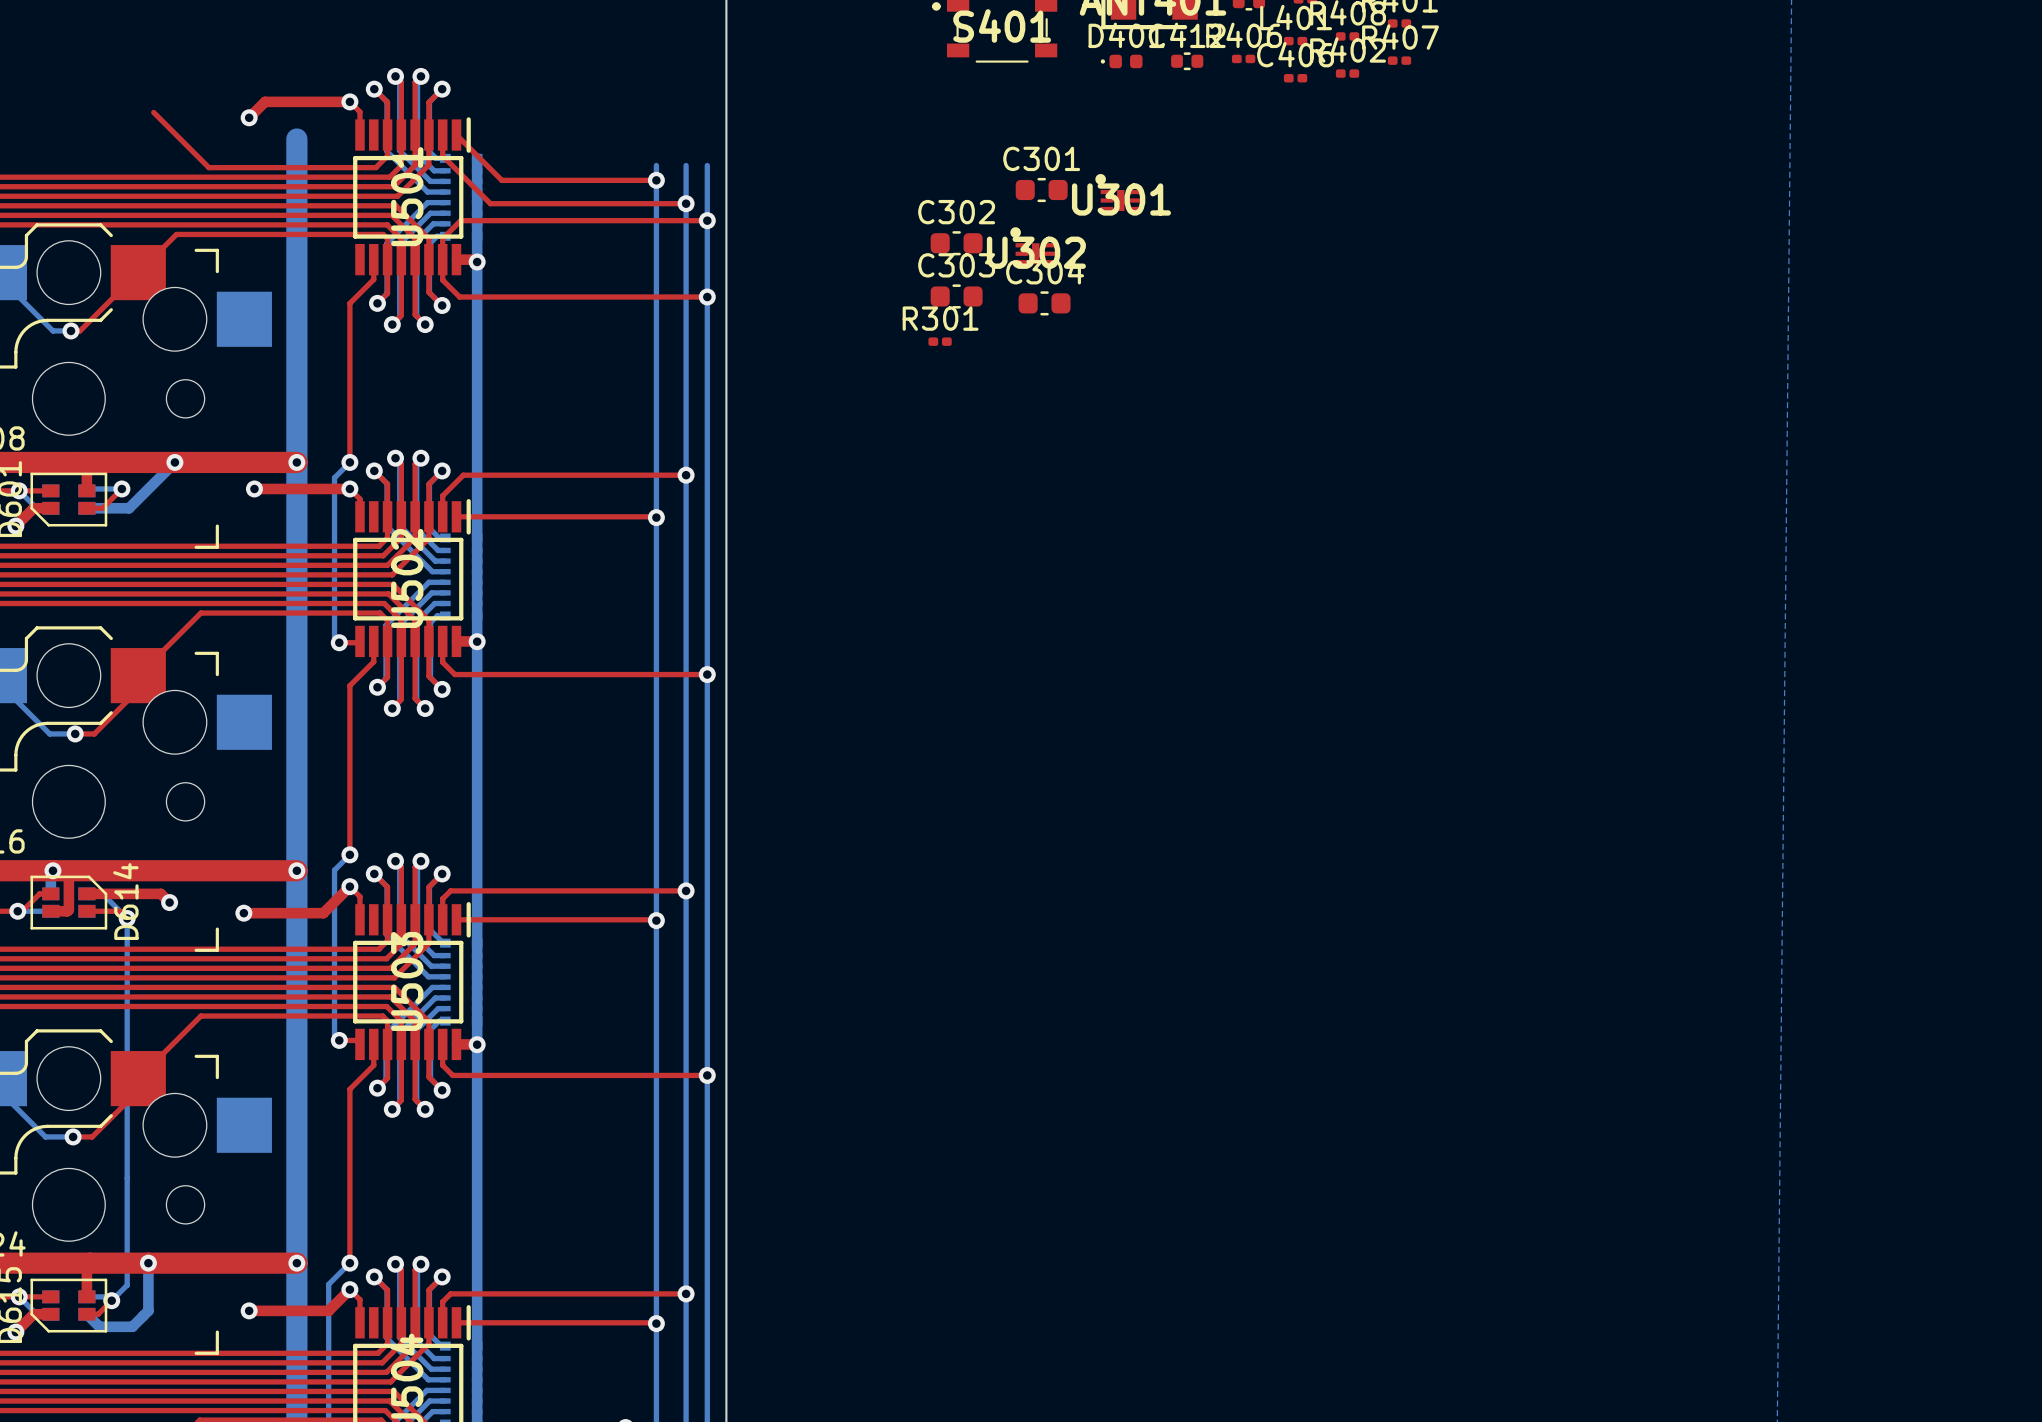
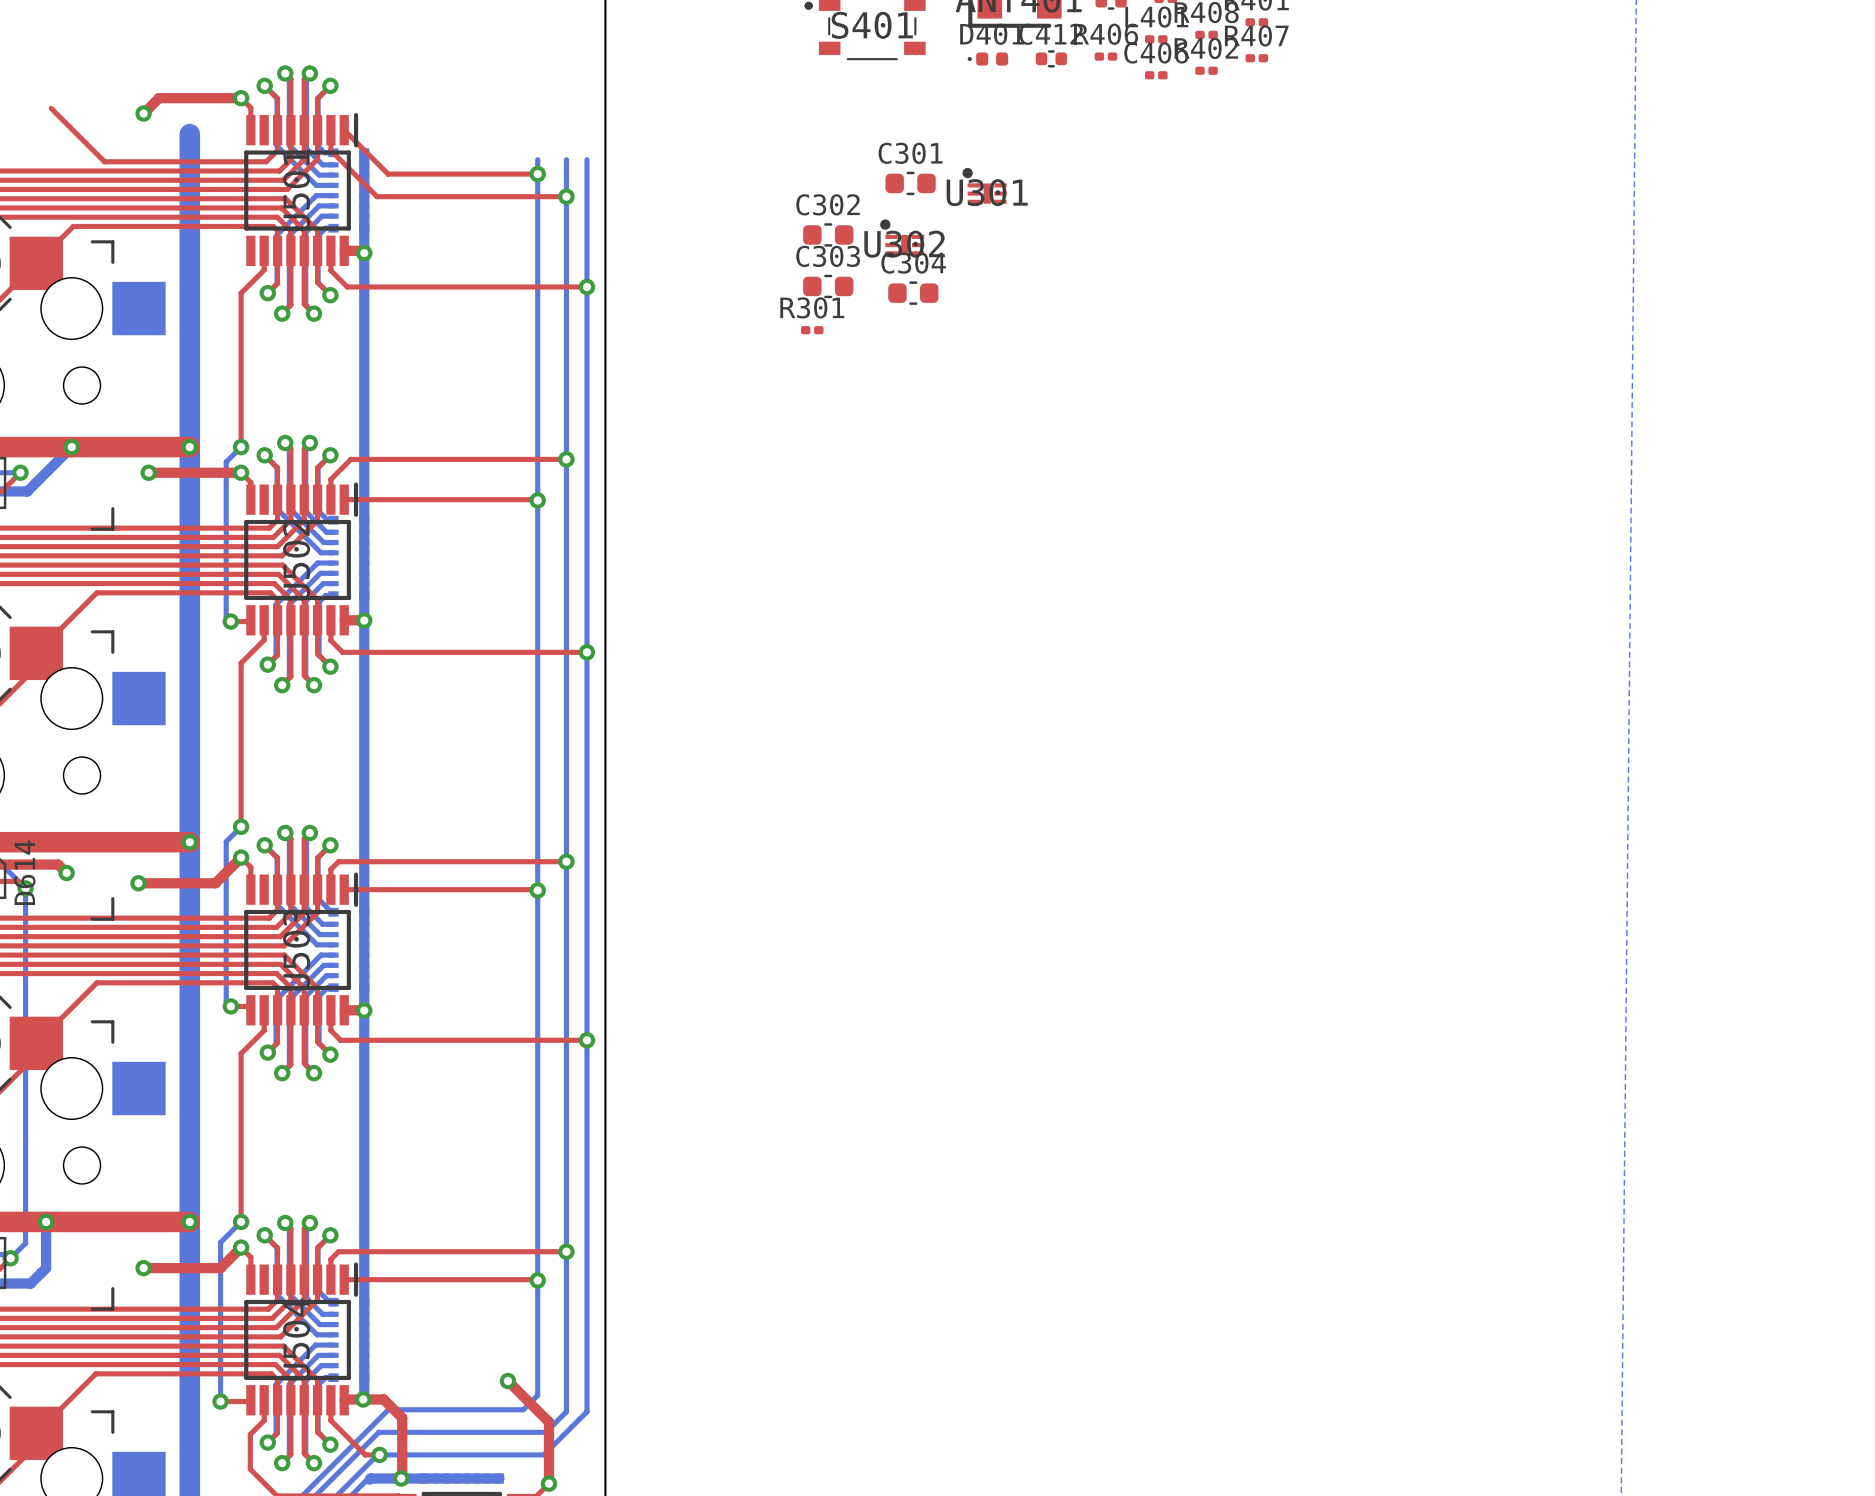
top track: (707, 220) (460, 220) (442, 238) (442, 259) -> none
via: (707, 220) -> none

